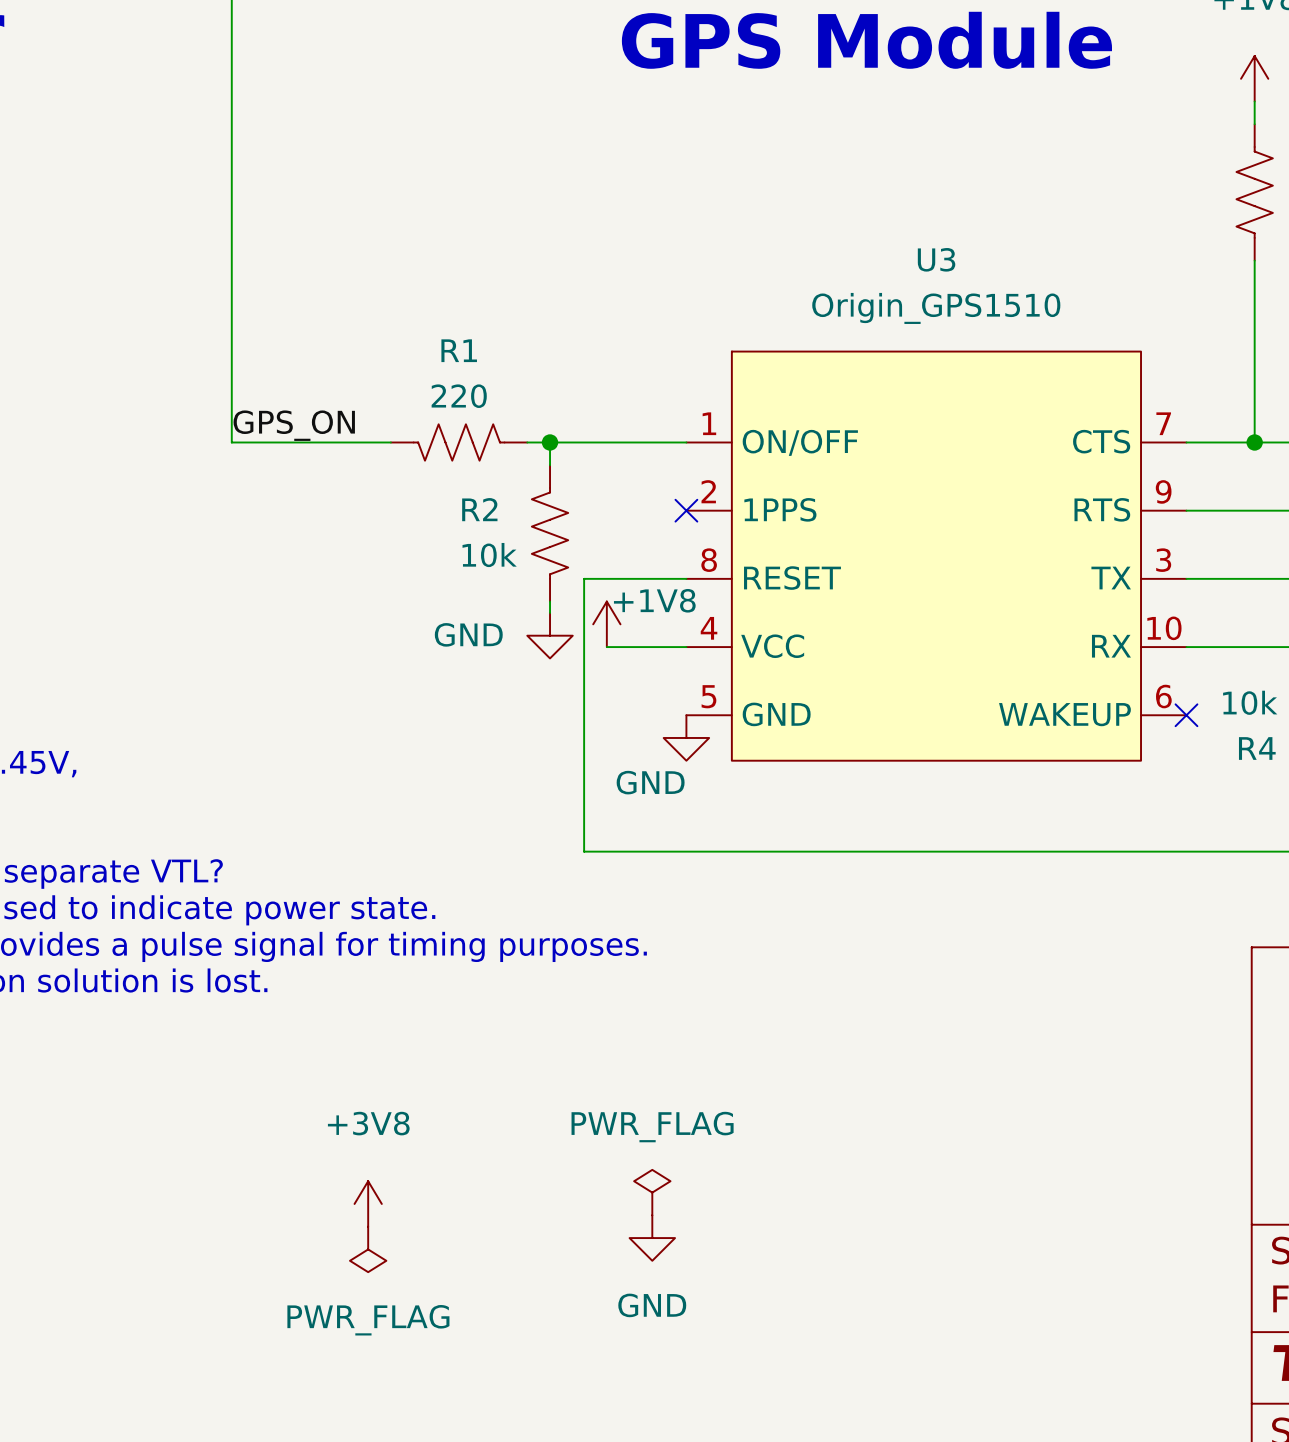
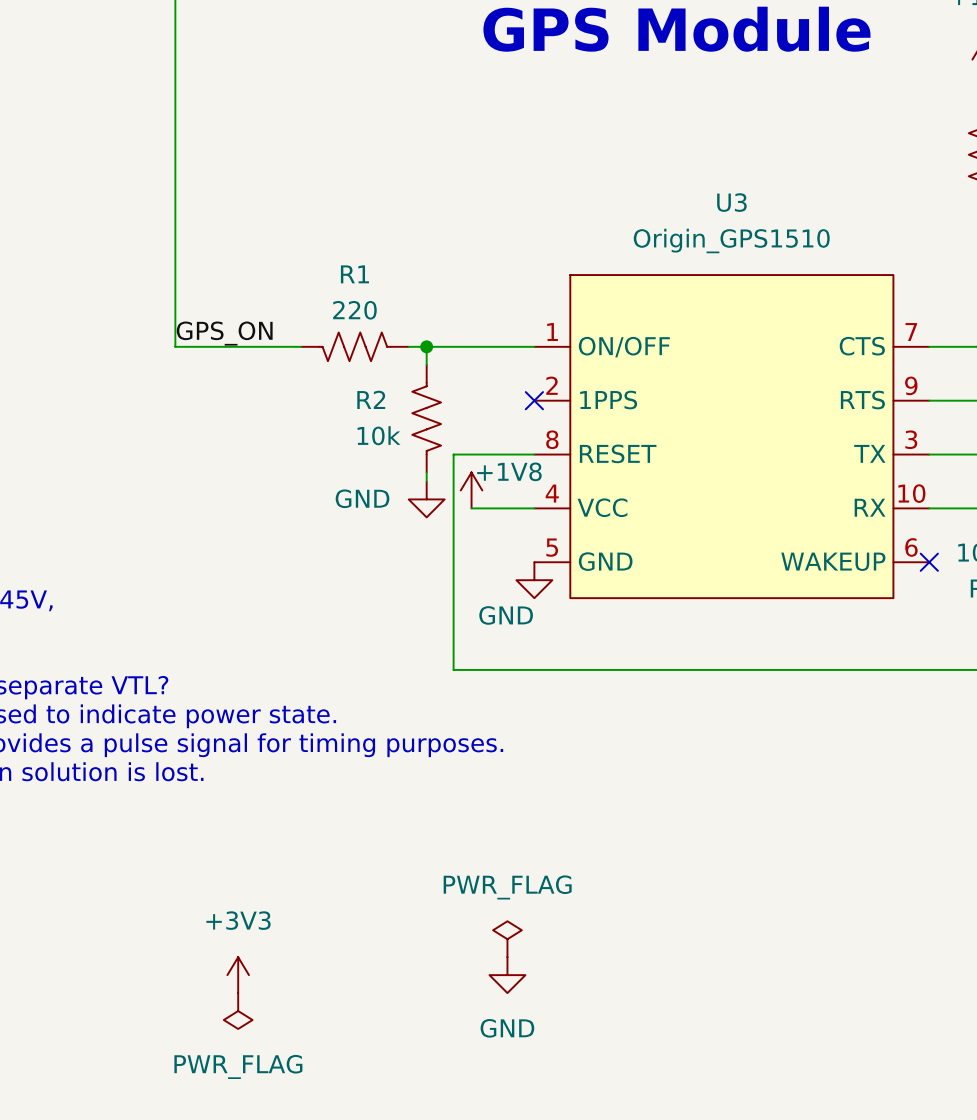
power symbol: +3V8 (368, 1203) -> none
power symbol: none -> +3V3 (238, 975)
power symbol position: PWR_FLAG (368, 1249) -> PWR_FLAG (238, 1011)

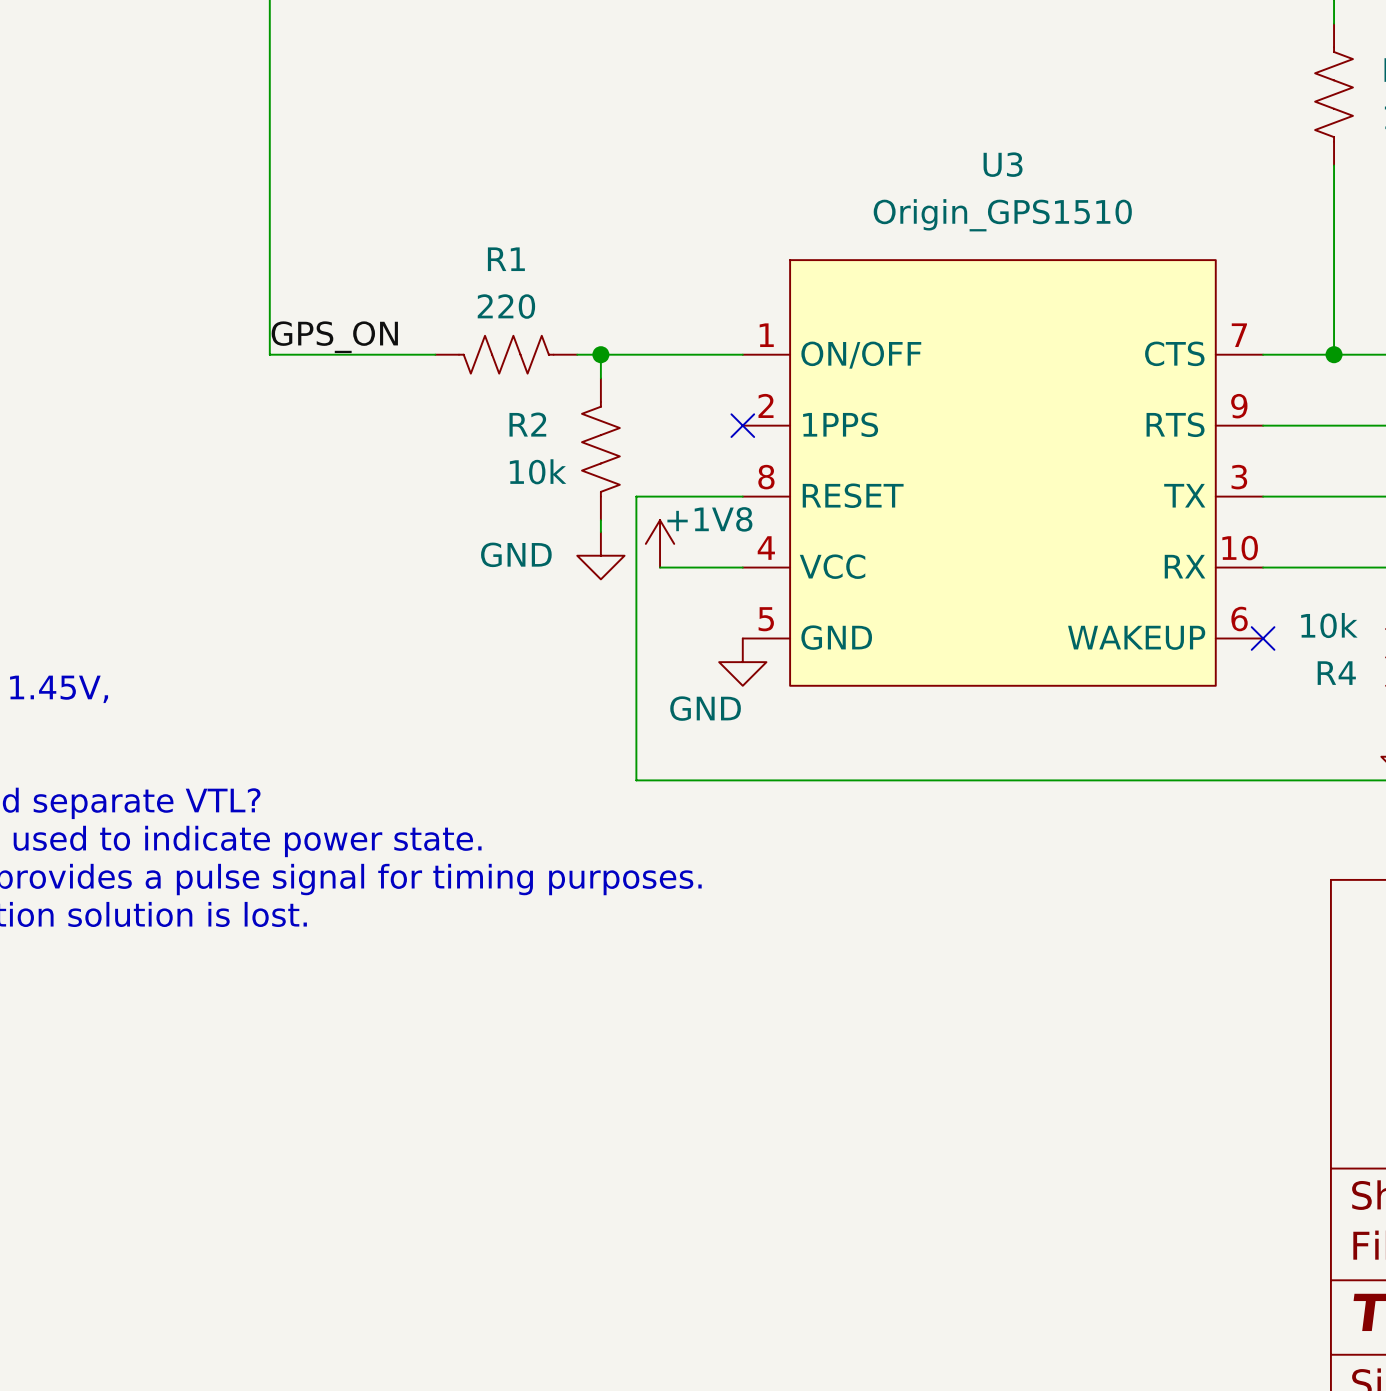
power symbol: PWR_FLAG (507, 939) -> none
power symbol: +3V3 (238, 975) -> none
power symbol: GND (507, 975) -> none
power symbol: PWR_FLAG (238, 1011) -> none

